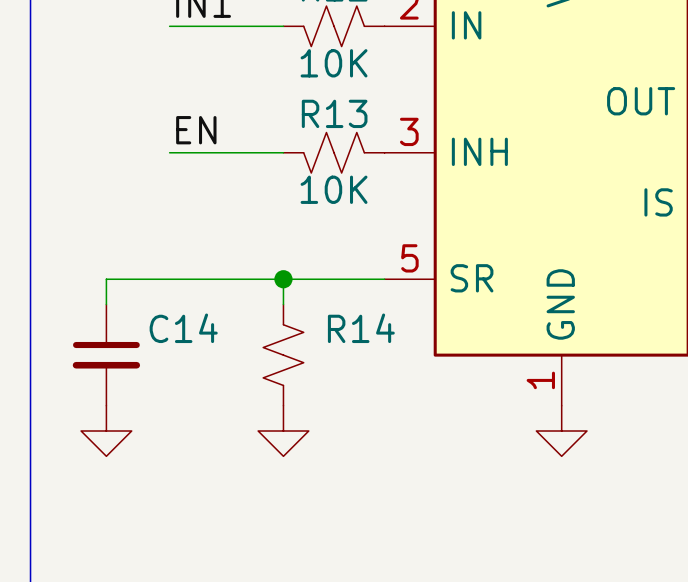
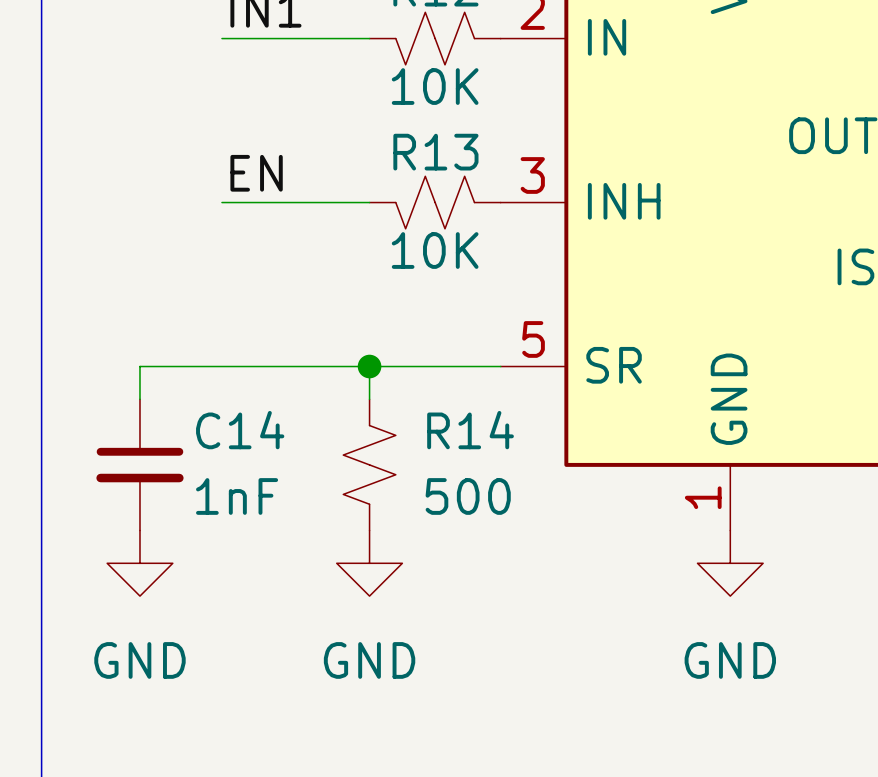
C14 value: none -> 1nF (237, 496)
R14 value: none -> 500 (468, 496)
power symbol text: none -> GND (139, 660)
power symbol text: none -> GND (369, 660)
power symbol text: none -> GND (730, 660)

